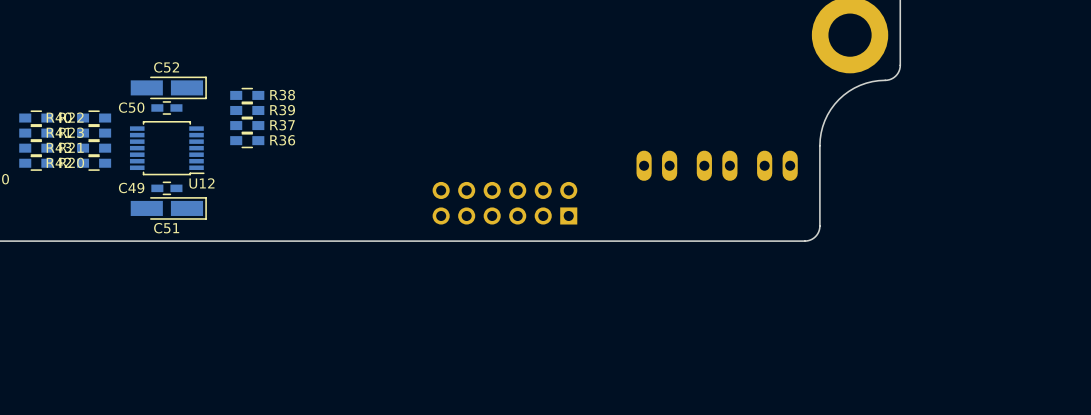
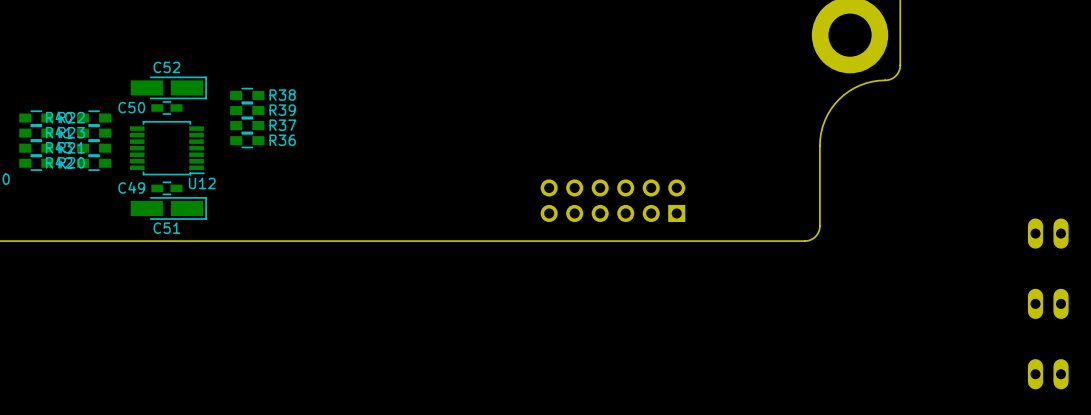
part: (656, 165) -> none
part: (717, 165) -> none
part: (777, 165) -> none
part position: (504, 203) -> (612, 200)
part: none -> (1048, 233)
part: none -> (1048, 303)
part: none -> (1048, 374)

